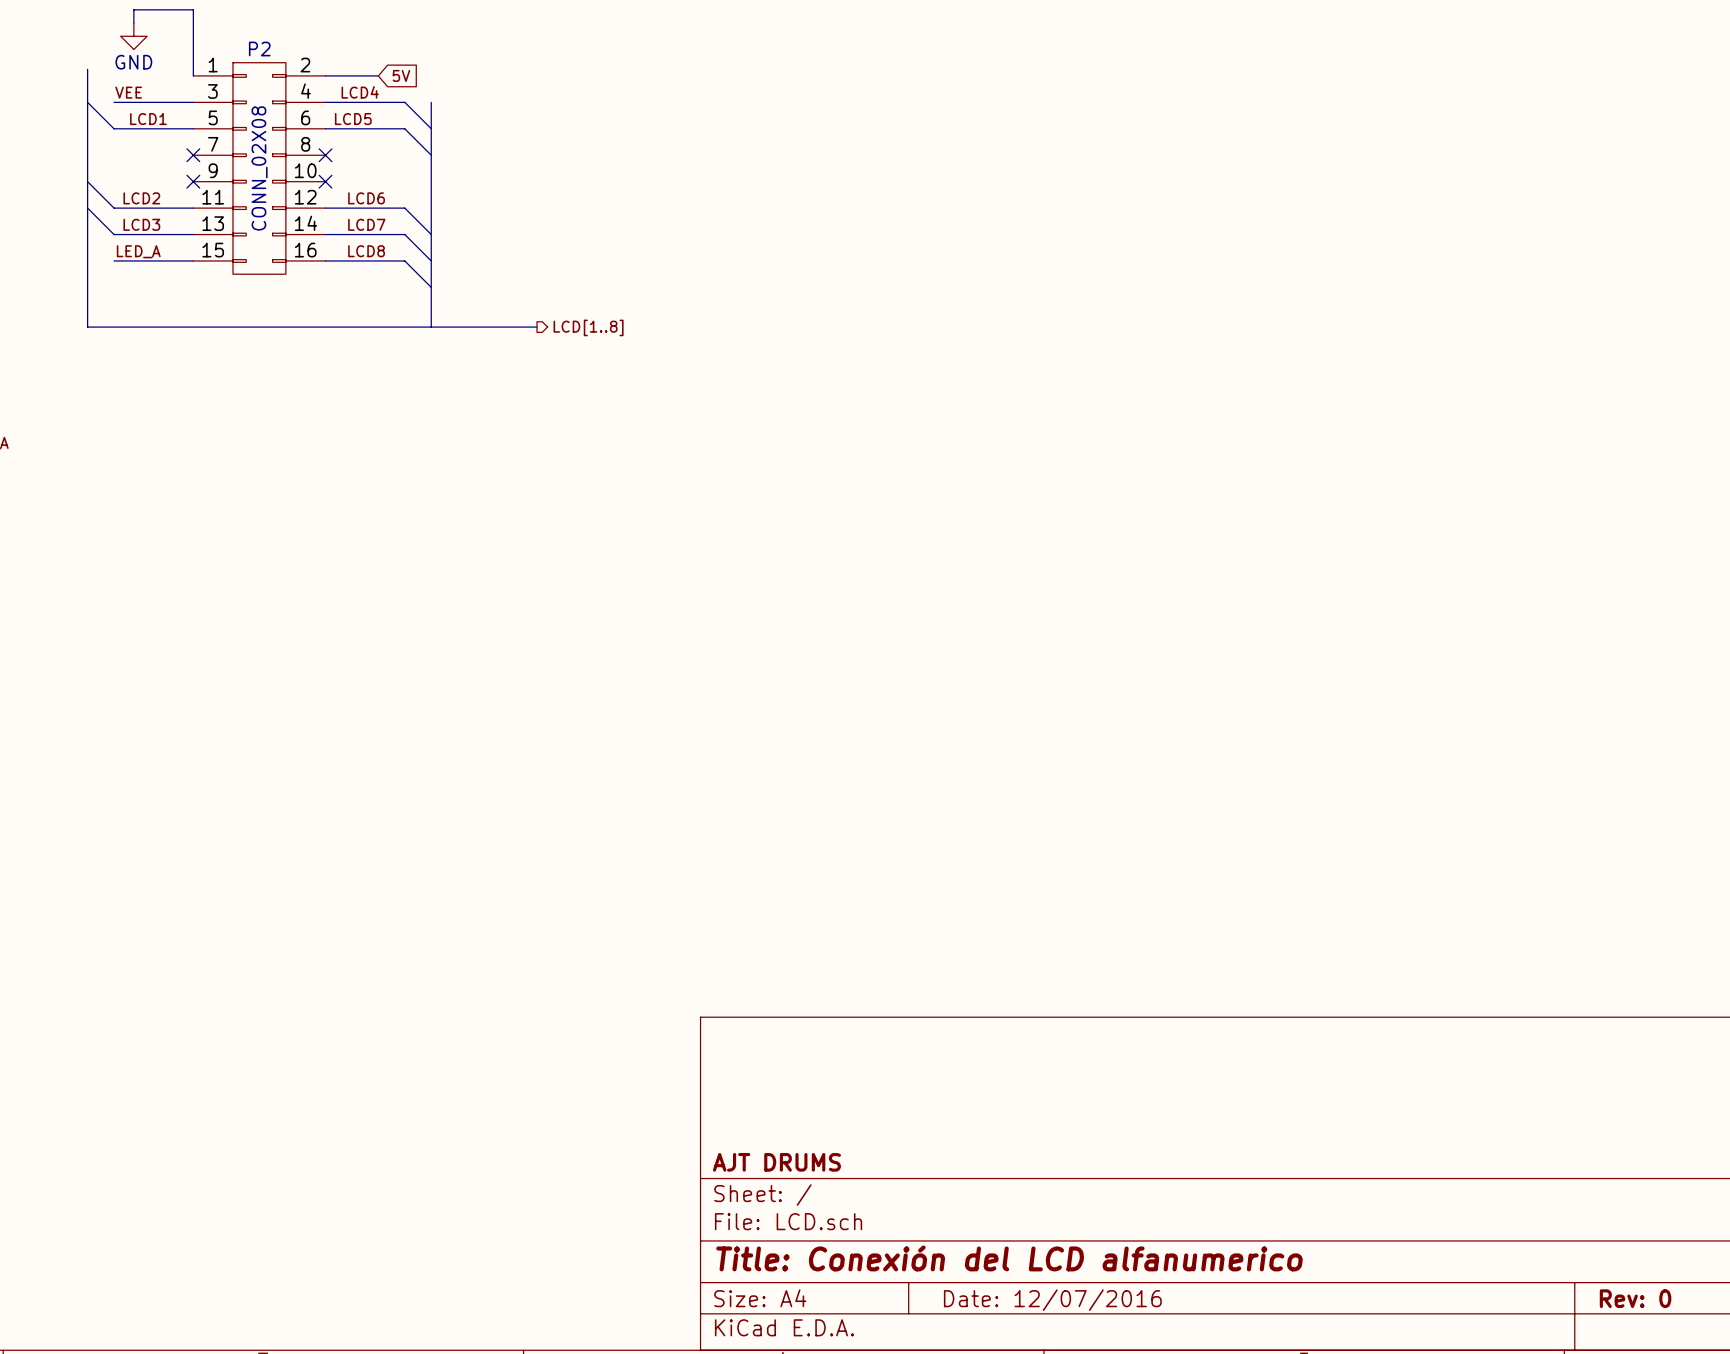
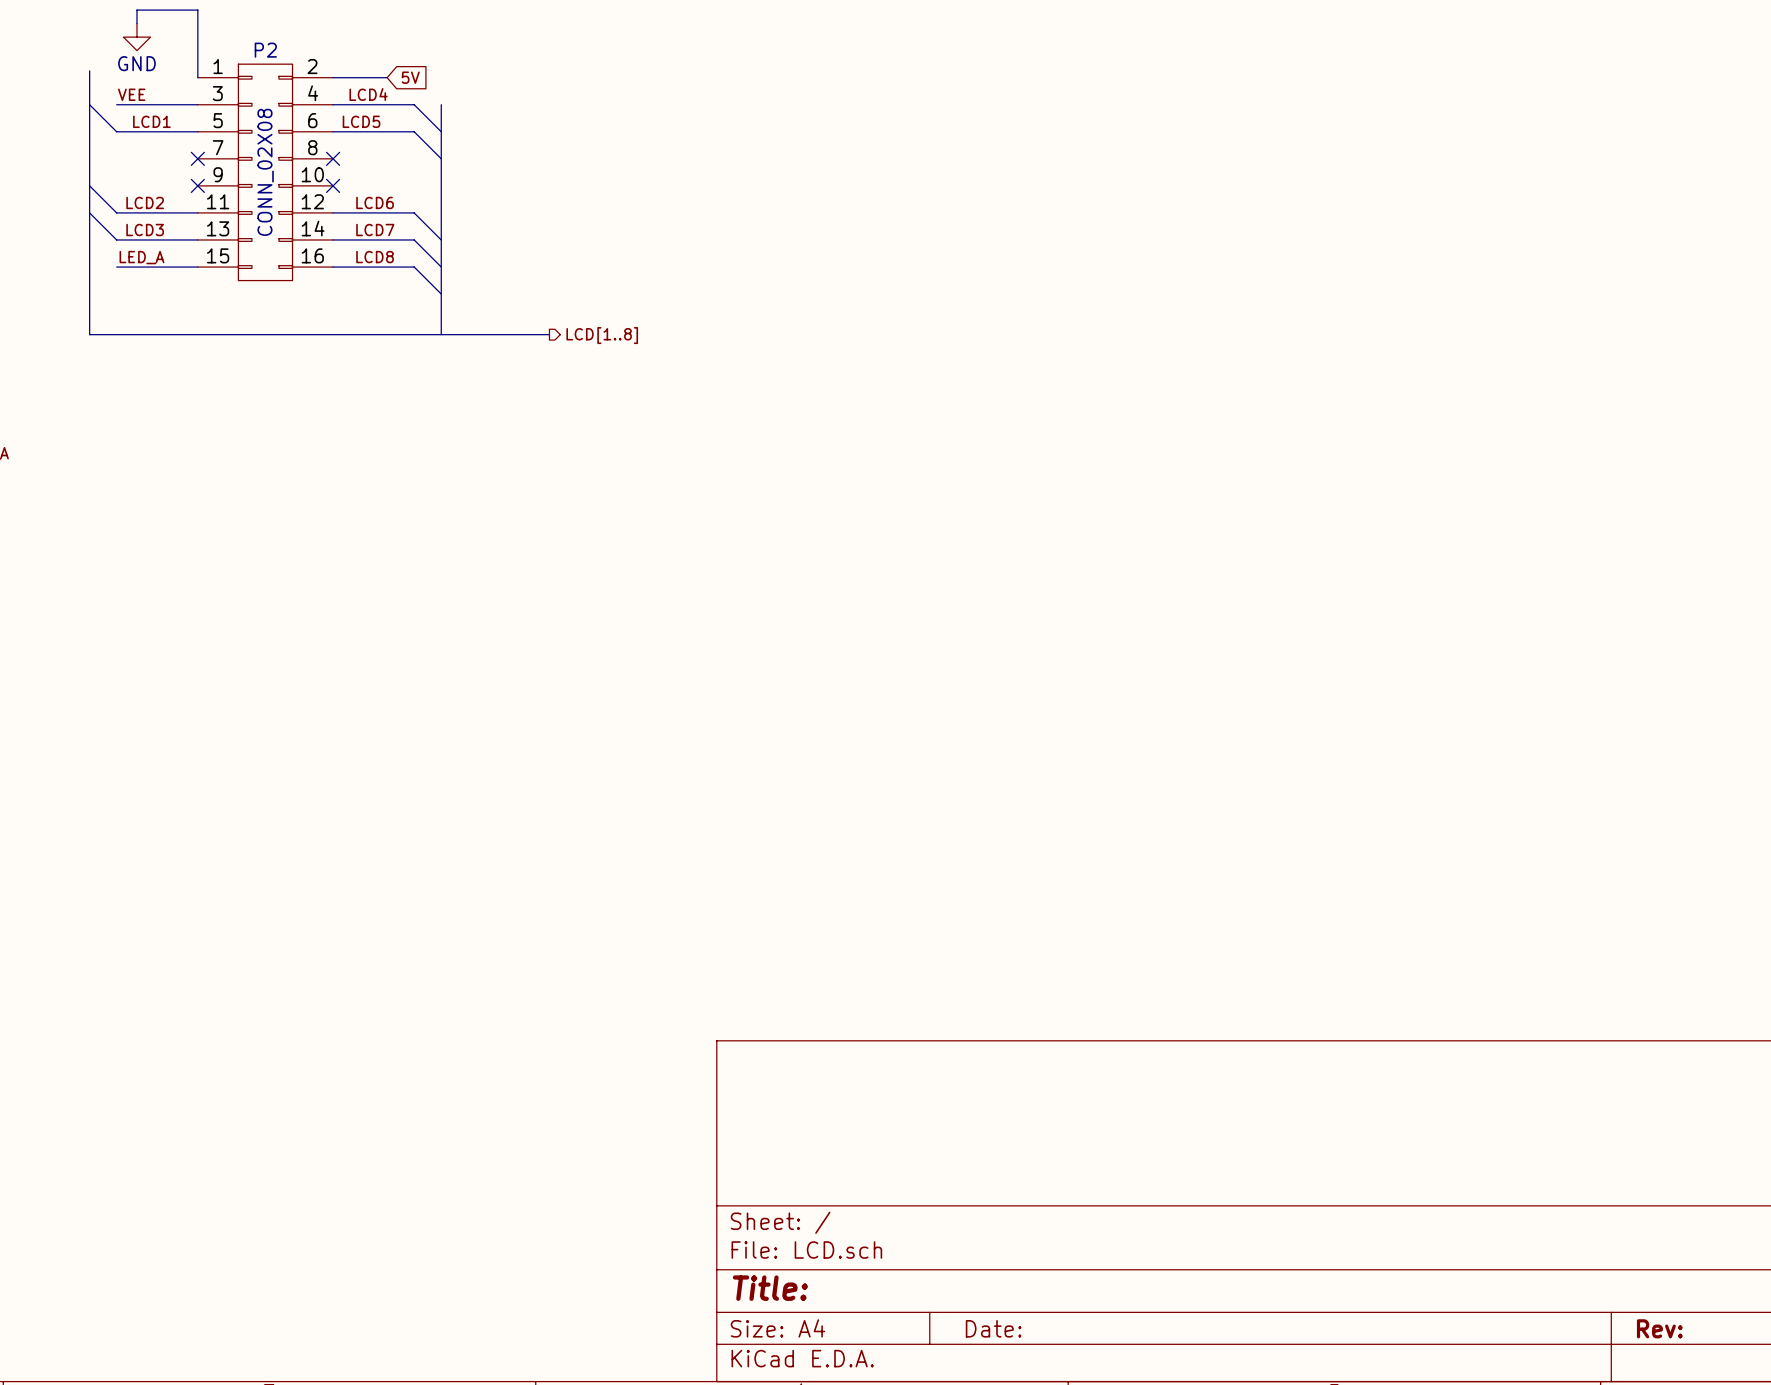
title block: AJT DRUMS (776, 1162) -> none
title block: Title: Conexión del LCD alfanumerico (1009, 1258) -> Title: (770, 1288)
title block: Rev: 0 (1635, 1298) -> Rev: (1659, 1328)
title block: Date: 12/07/2016 (1052, 1300) -> Date: (993, 1328)

